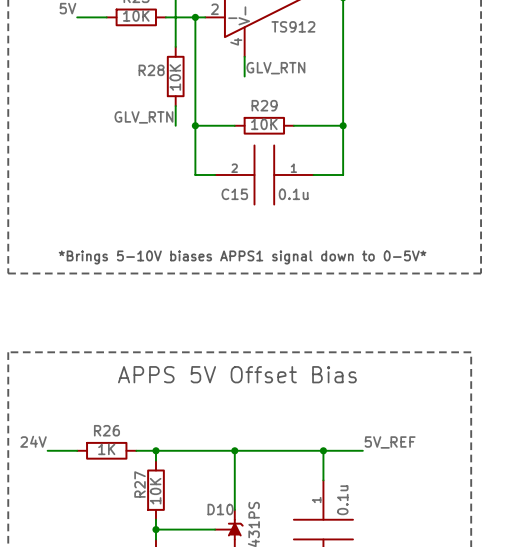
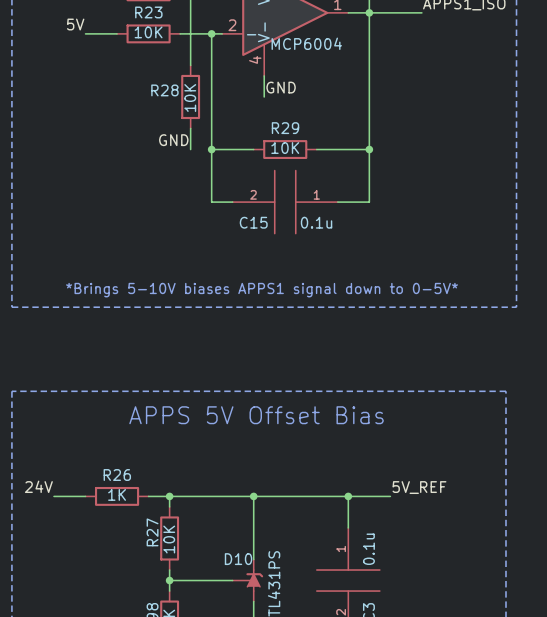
part value: TS912 (293, 26) -> MCP6004 (306, 43)
label: GLV_RTN (275, 68) -> GND (281, 87)
label: GLV_RTN (143, 117) -> GND (173, 140)

